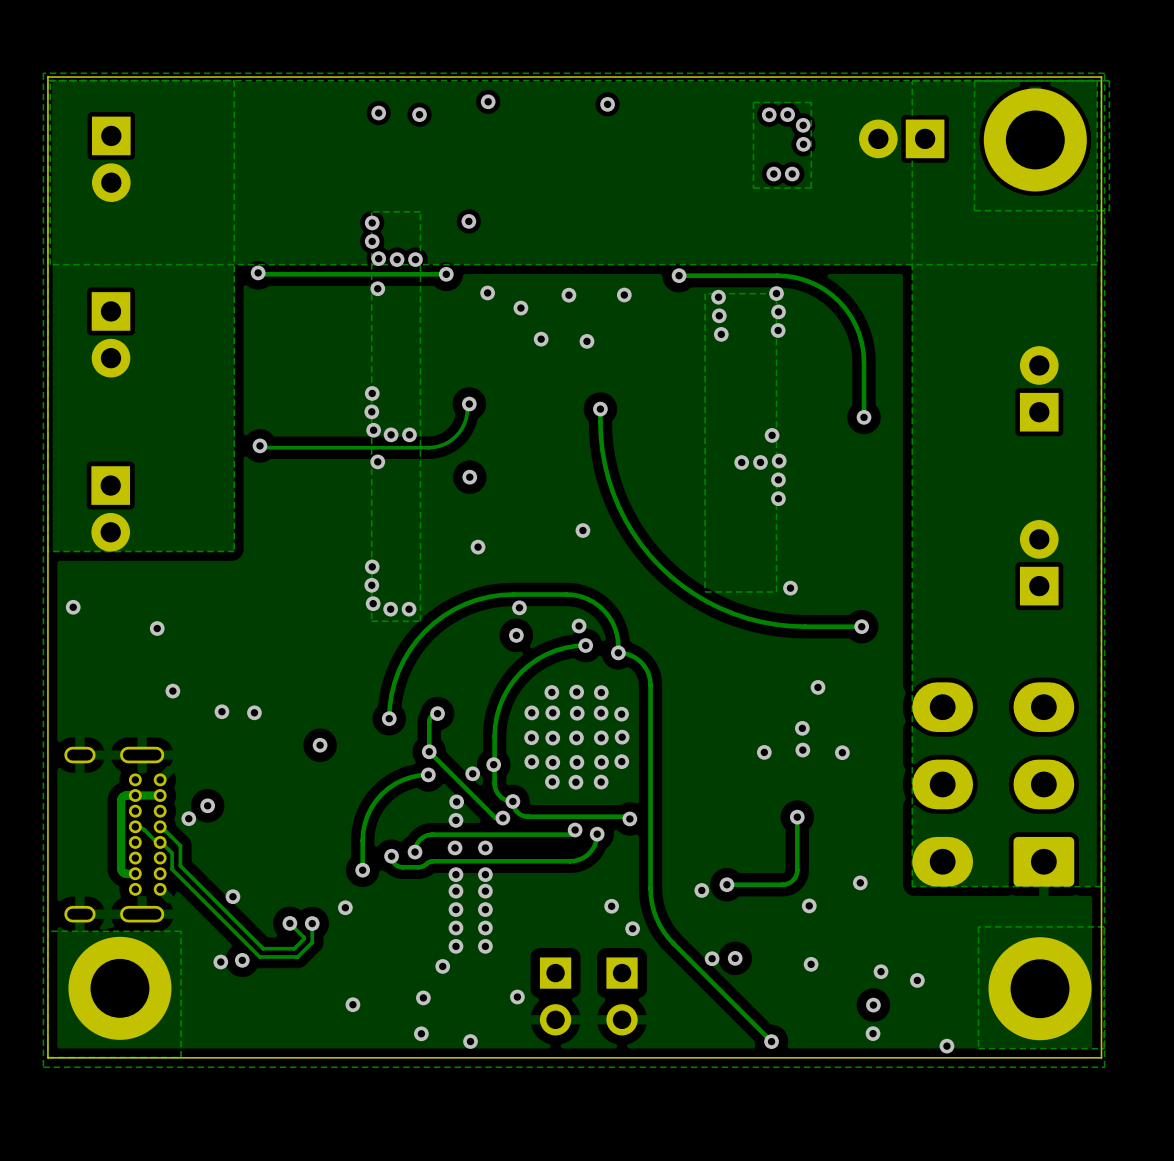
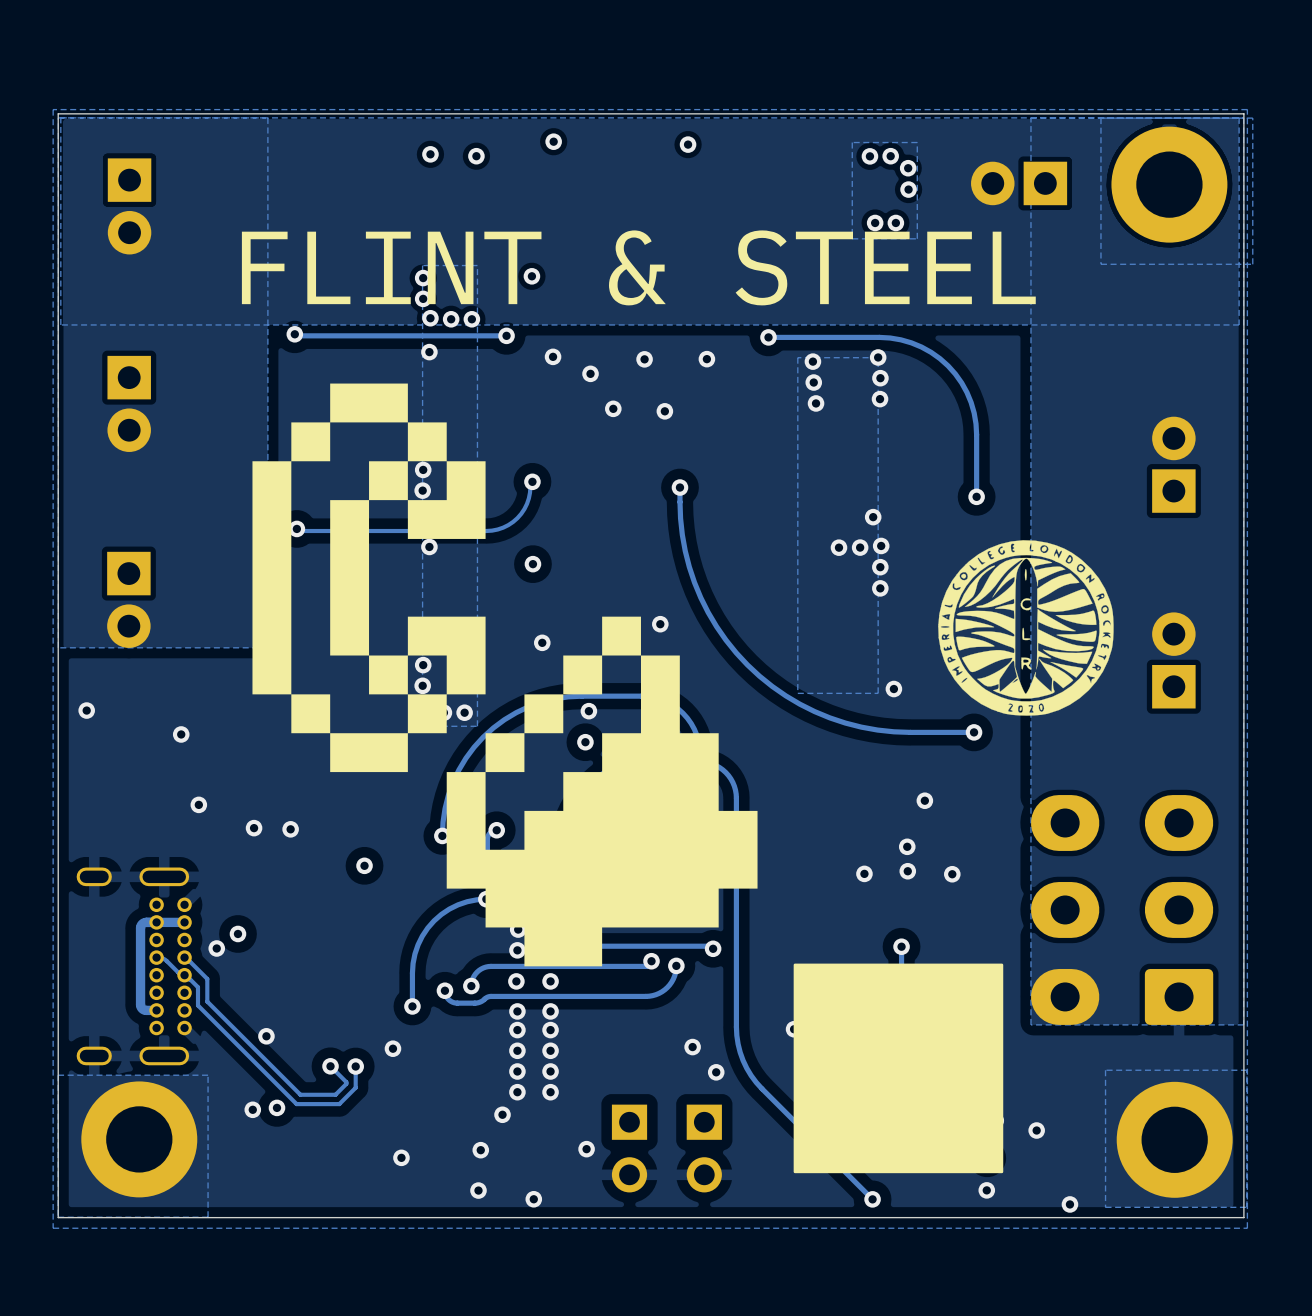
text: none -> FLINT & STEEL (638, 267)
drawing: none -> [252, 383, 758, 967]
drawing: none -> [938, 540, 1114, 716]
drawing: none -> [793, 963, 1004, 1174]

